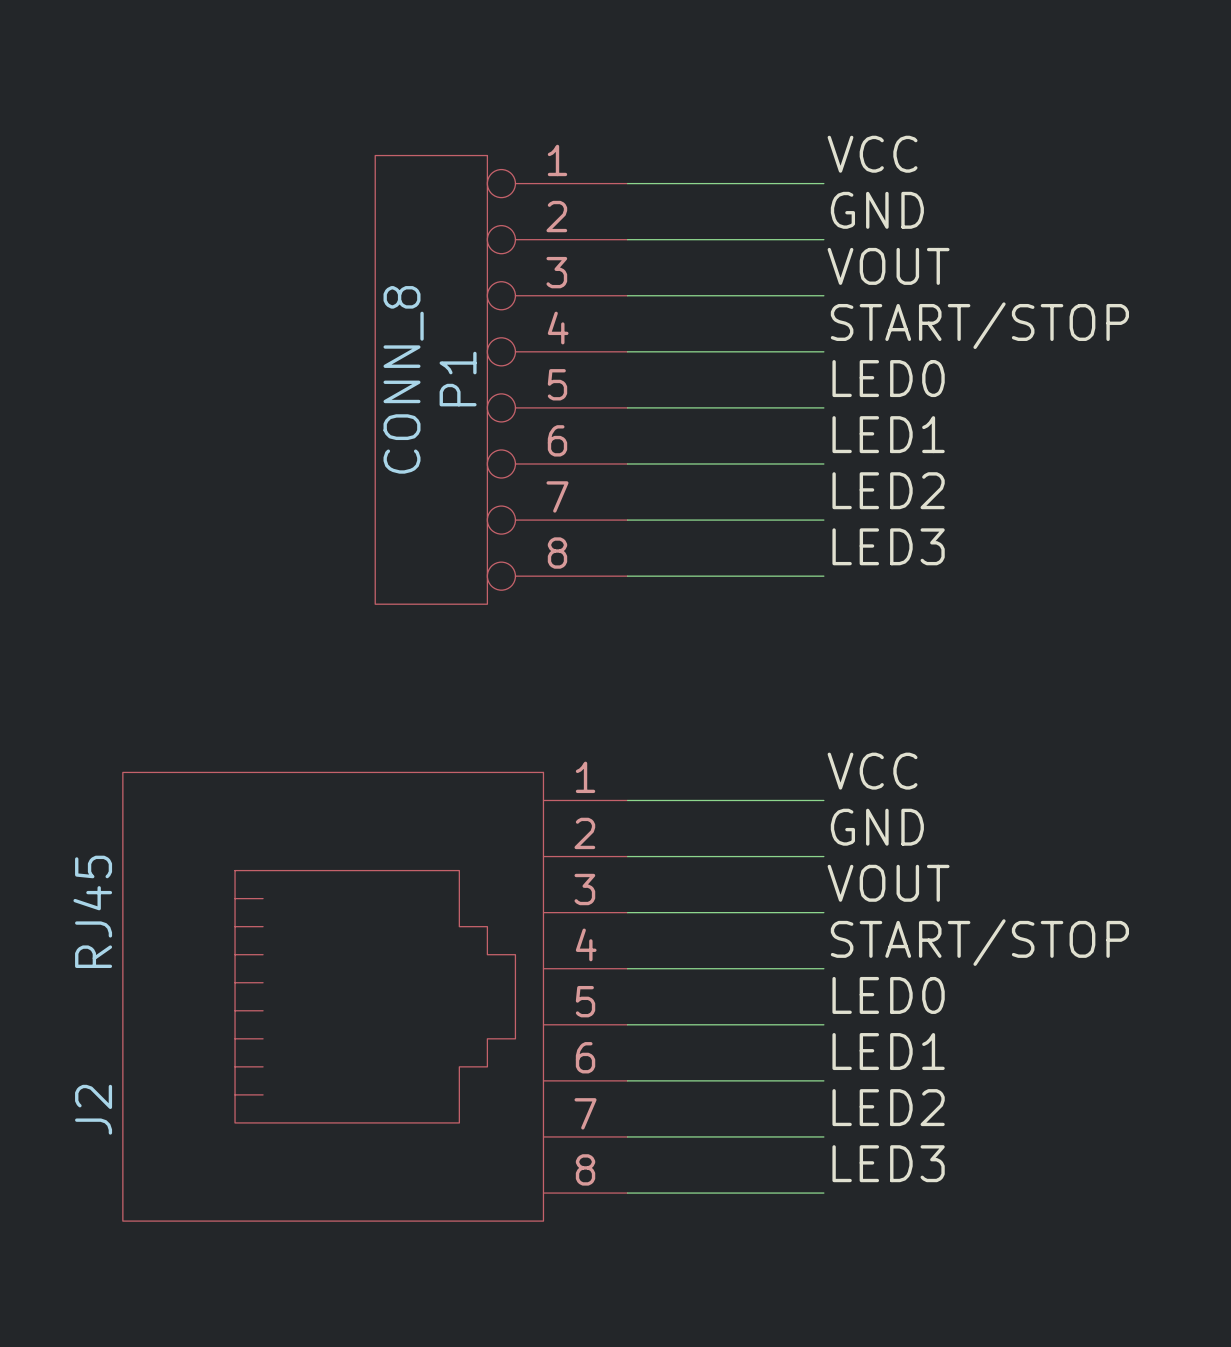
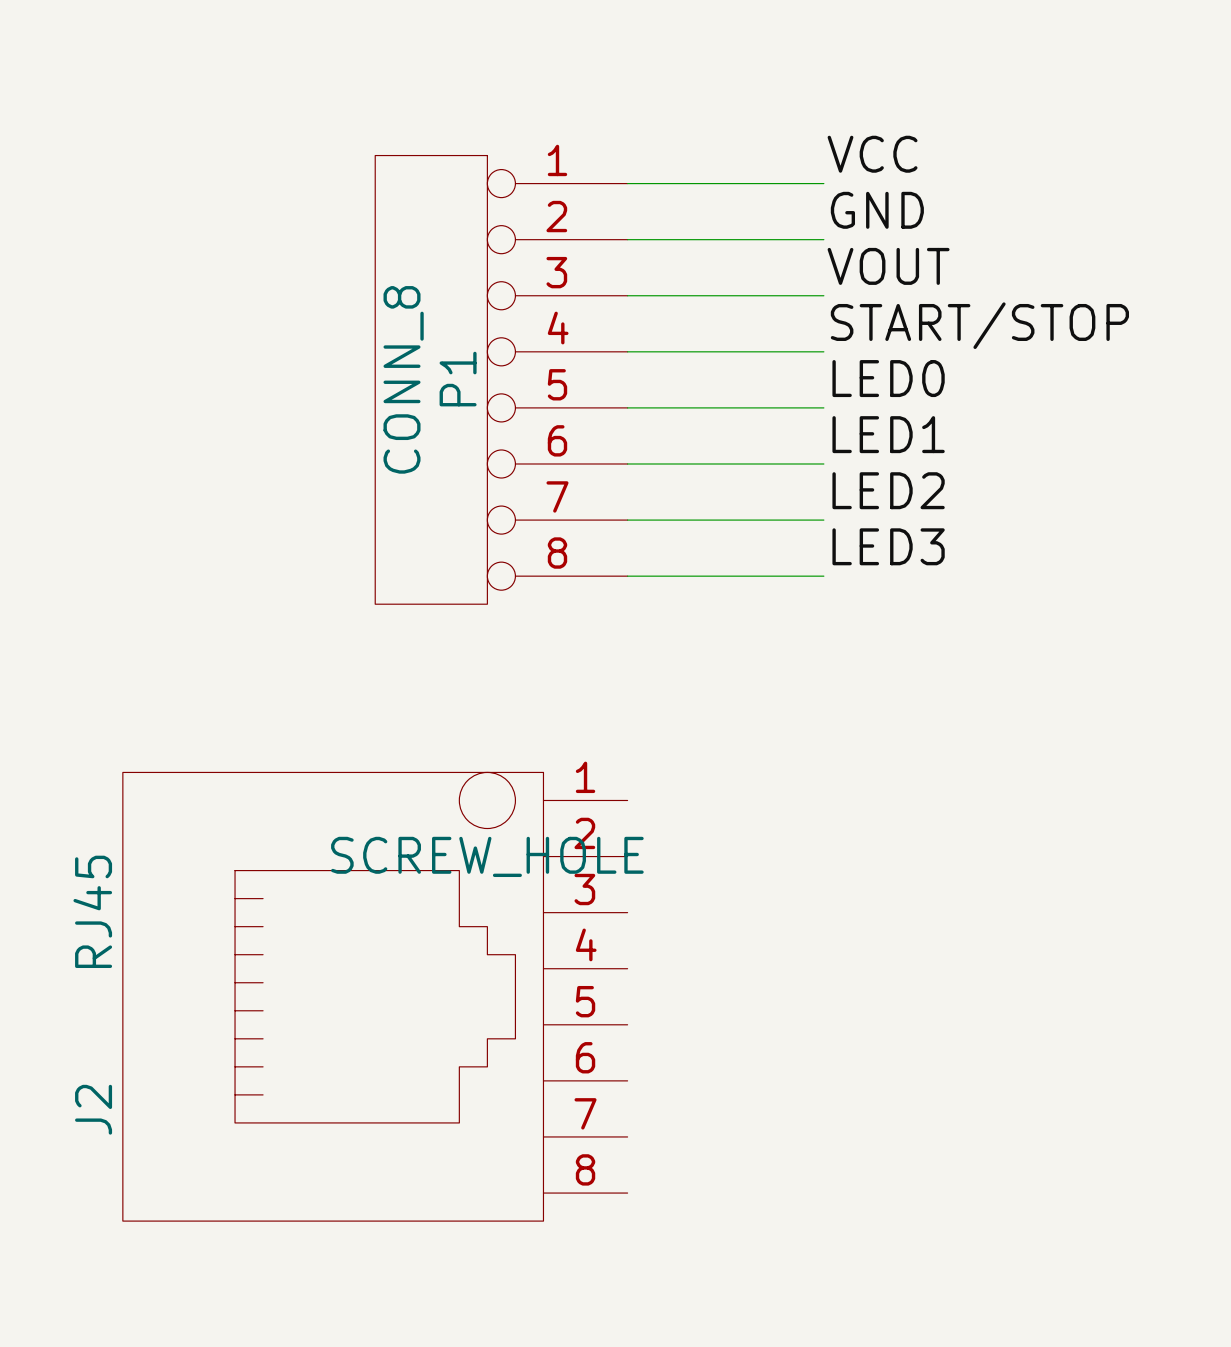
label: VCC (872, 771) -> none
part: none -> SCREW_HOLE (487, 800)
wire: (627, 800) (823, 800) -> none
label: GND (877, 827) -> none
wire: (627, 856) (823, 856) -> none
label: VOUT (888, 883) -> none
wire: (627, 912) (823, 912) -> none
label: START/STOP (979, 942) -> none
wire: (627, 968) (823, 968) -> none
label: LED0 (888, 995) -> none
wire: (627, 1024) (823, 1024) -> none
label: LED1 (888, 1051) -> none
wire: (627, 1080) (823, 1080) -> none
label: LED2 (888, 1107) -> none
wire: (627, 1136) (823, 1136) -> none
label: LED3 (888, 1163) -> none
wire: (627, 1193) (823, 1193) -> none

